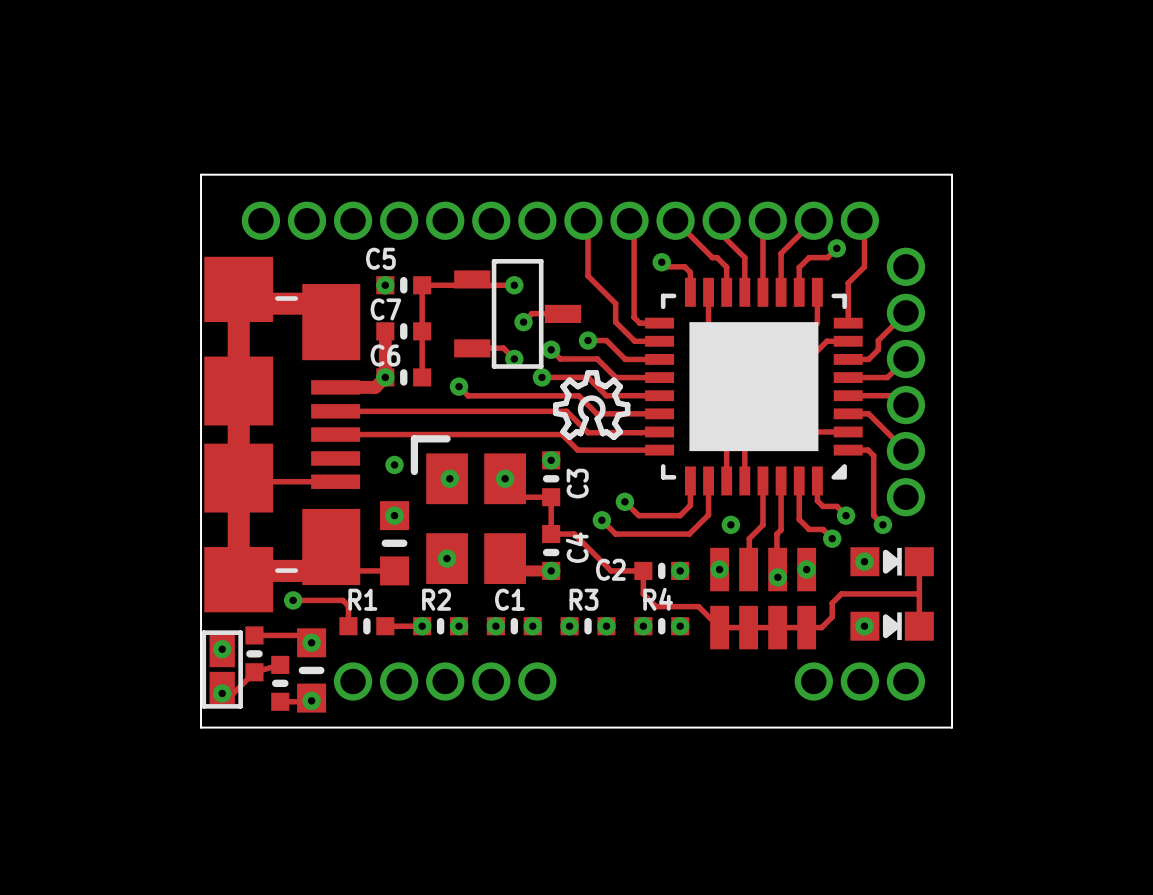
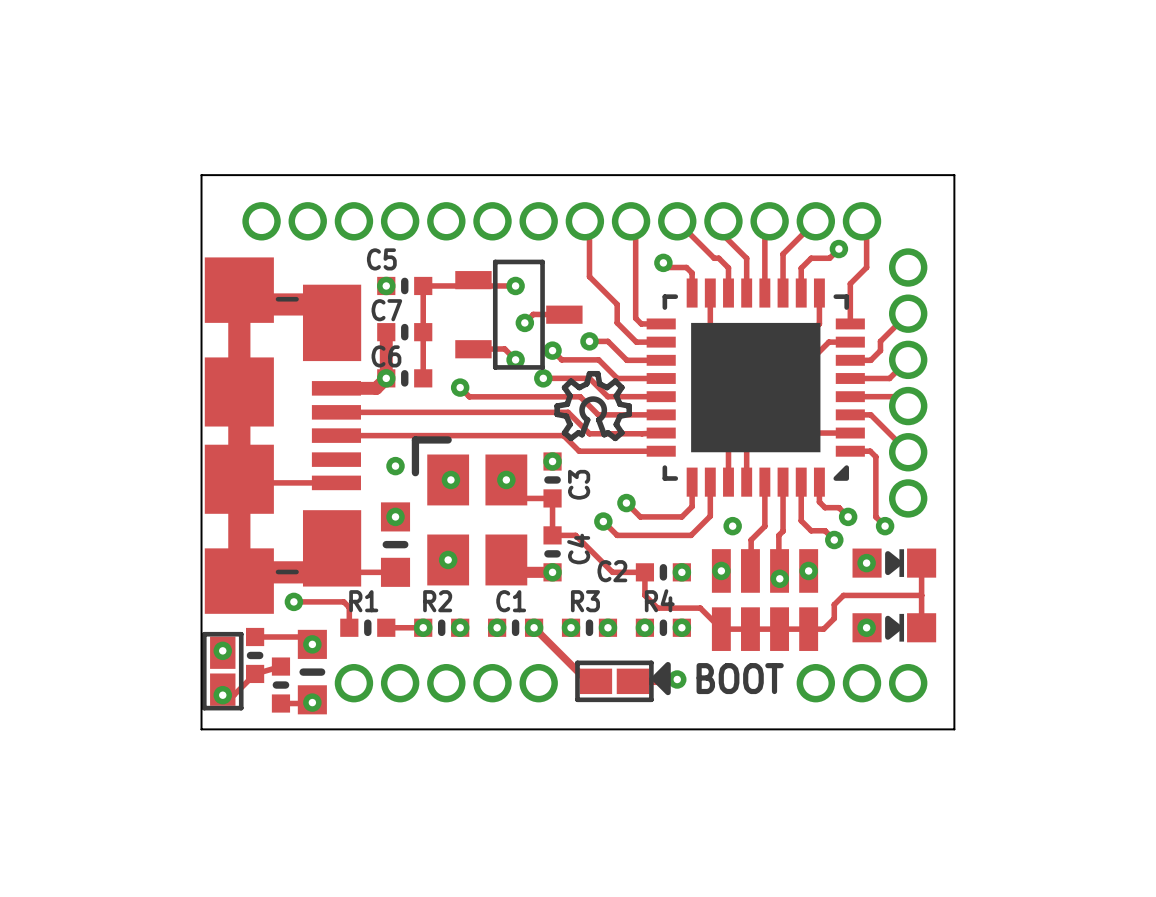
track: none -> (534, 627) (587, 681) (595, 681)
drawing: none -> [651, 661, 671, 696]
text: none -> BOOT (740, 678)
via: none -> (677, 679)
part: none -> (614, 681)

